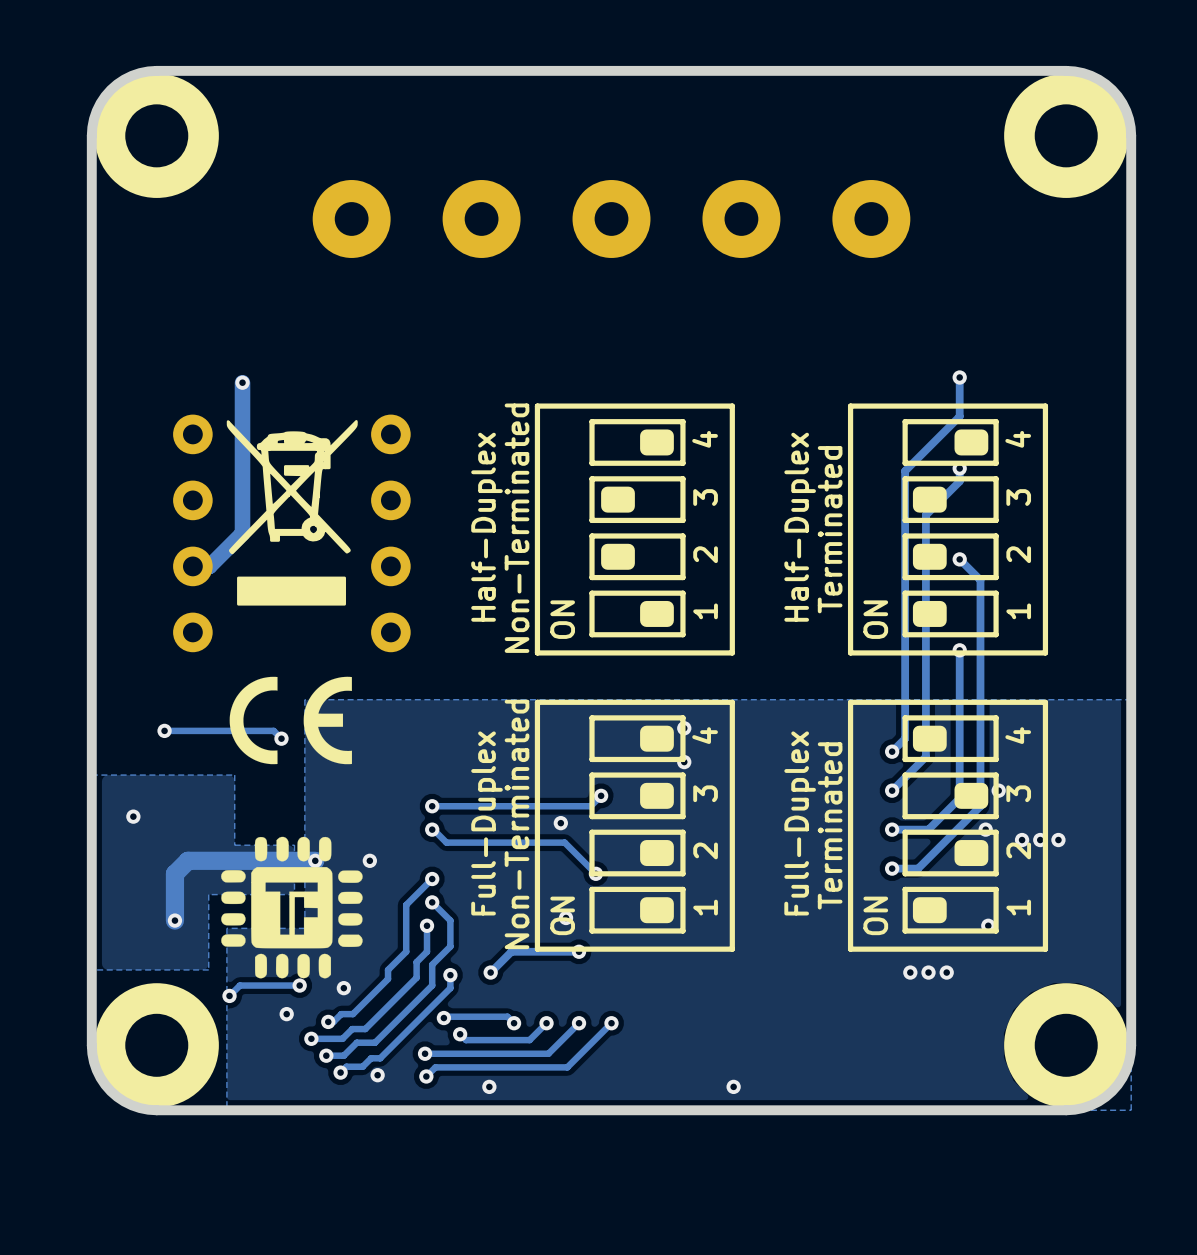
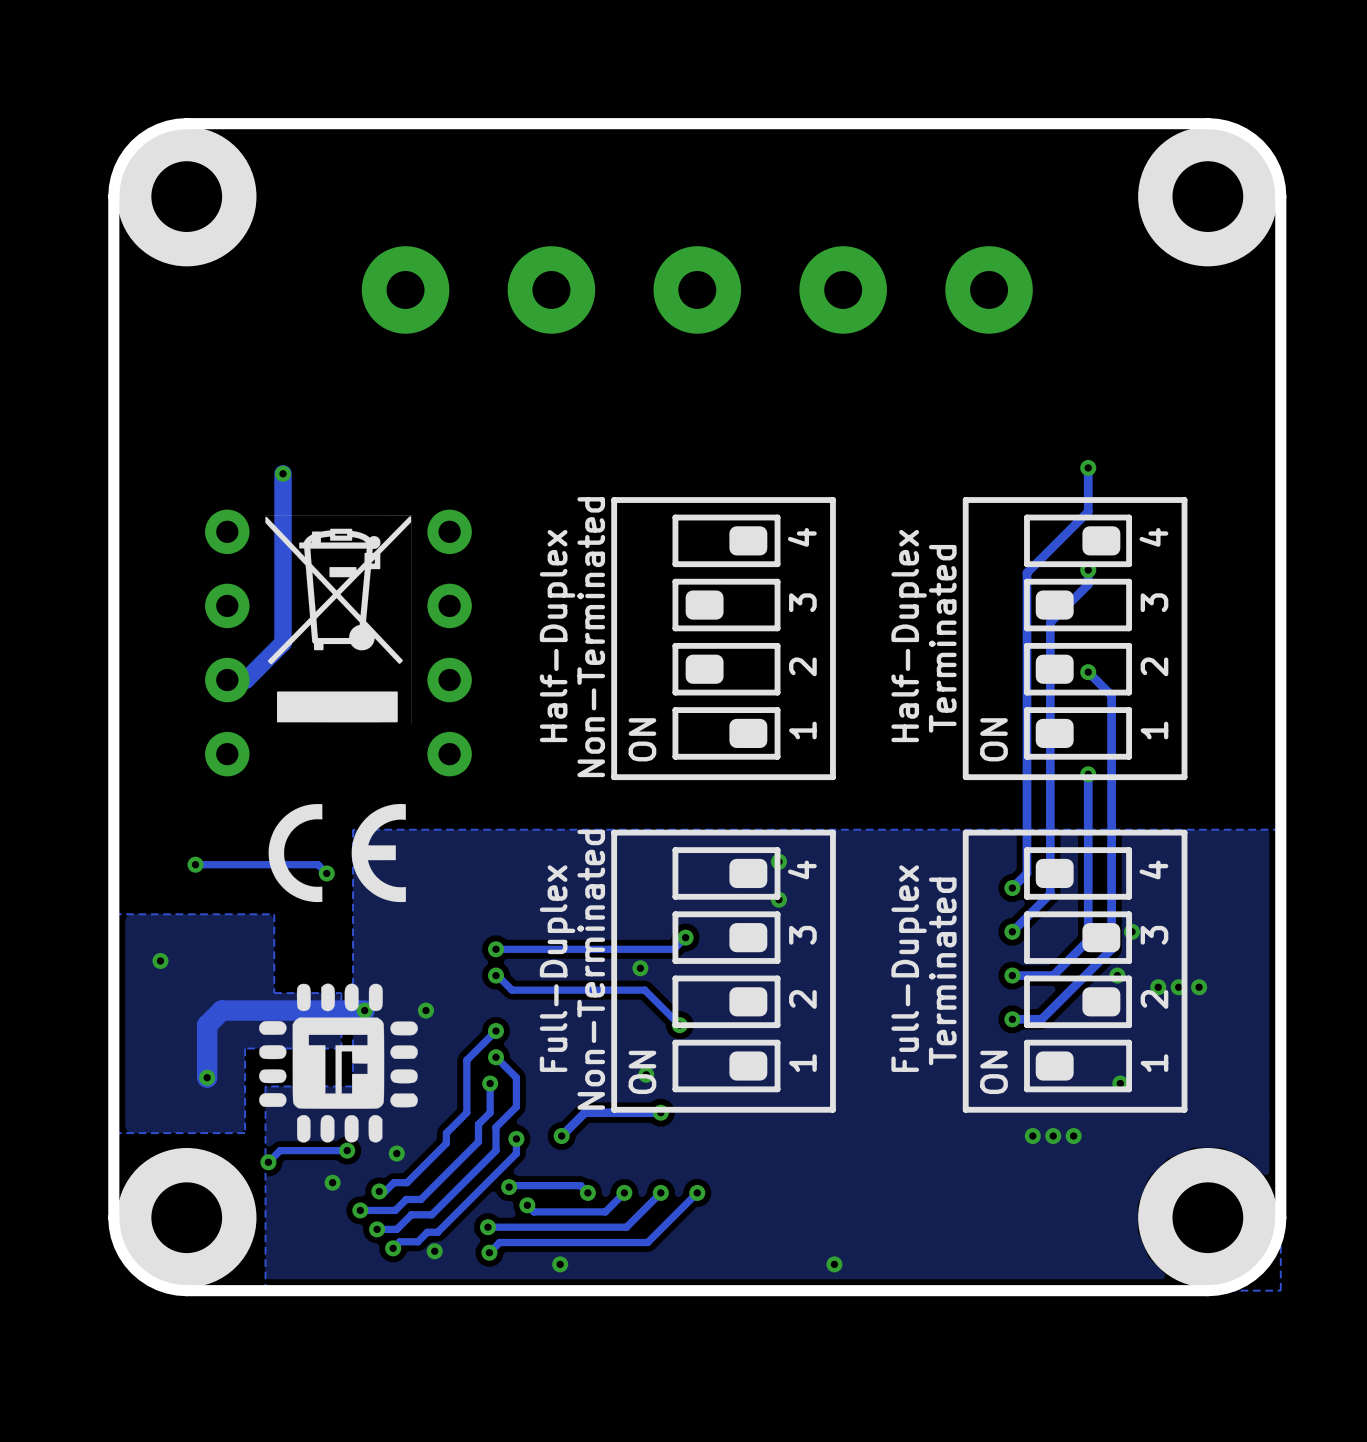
drawing shape: [226, 420, 358, 606] -> [265, 515, 412, 724]

